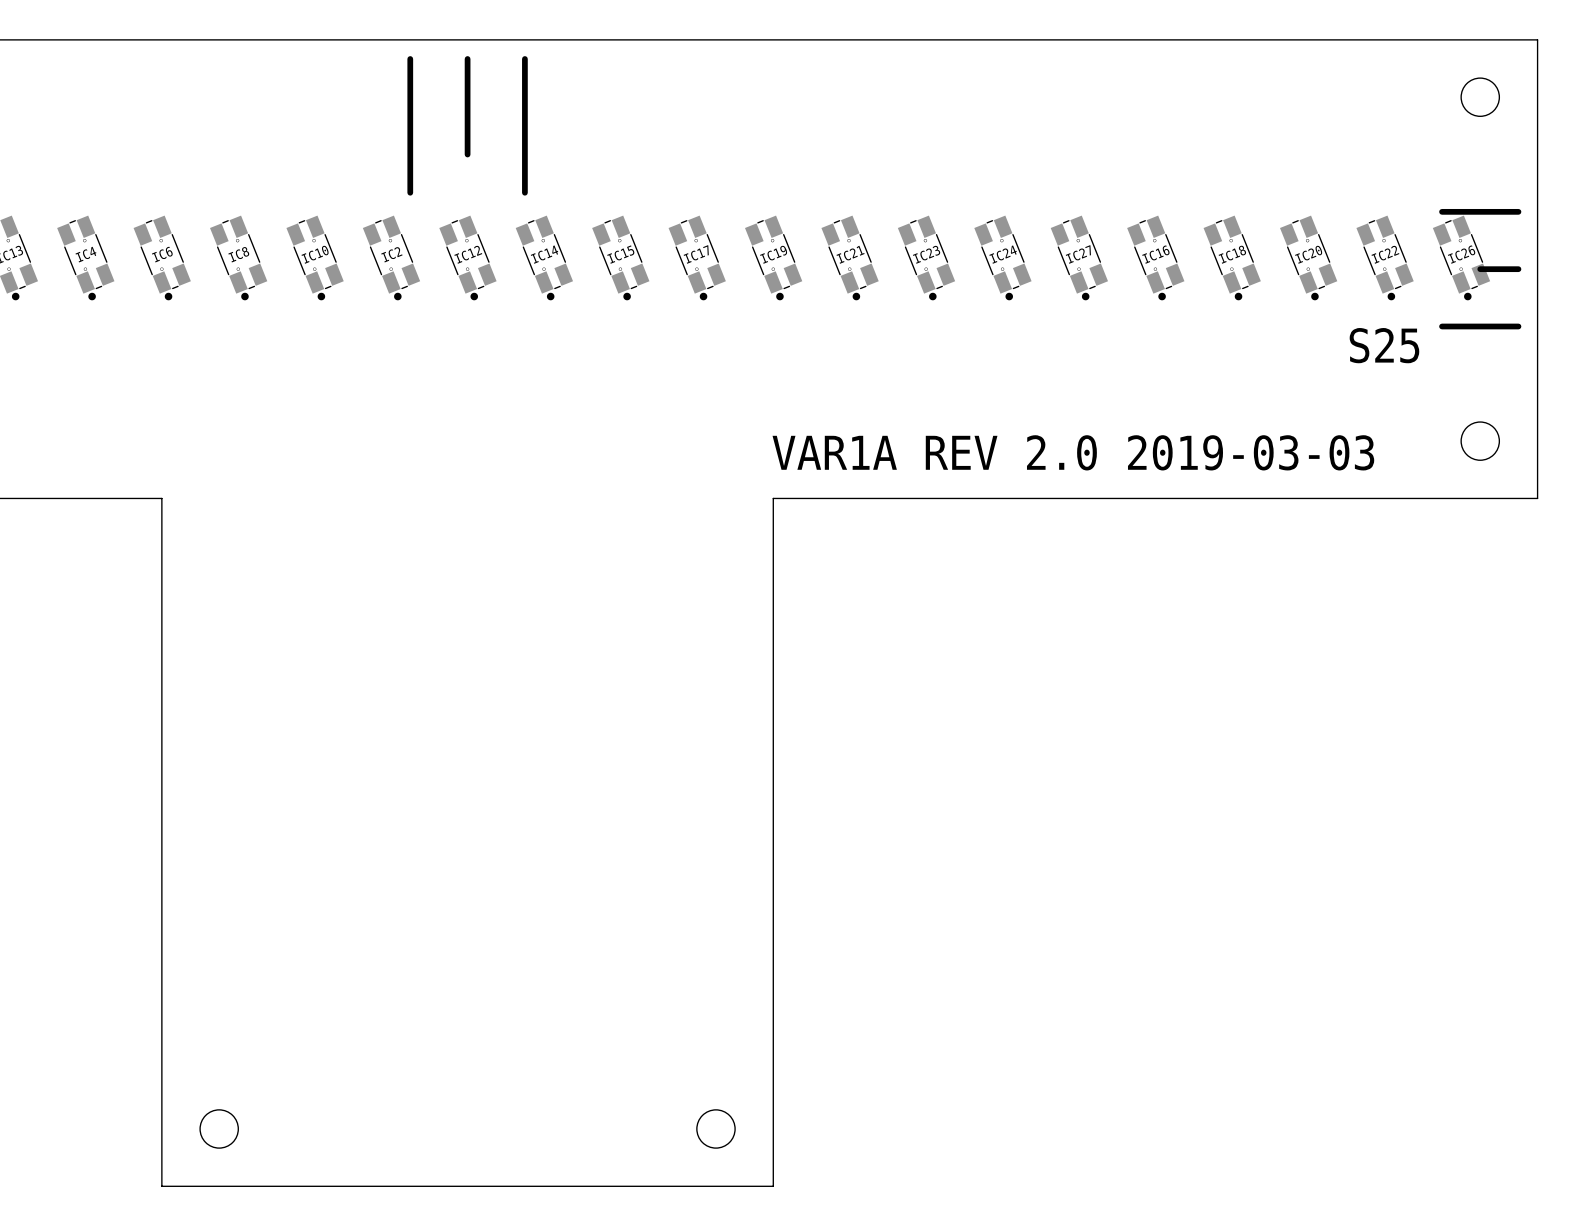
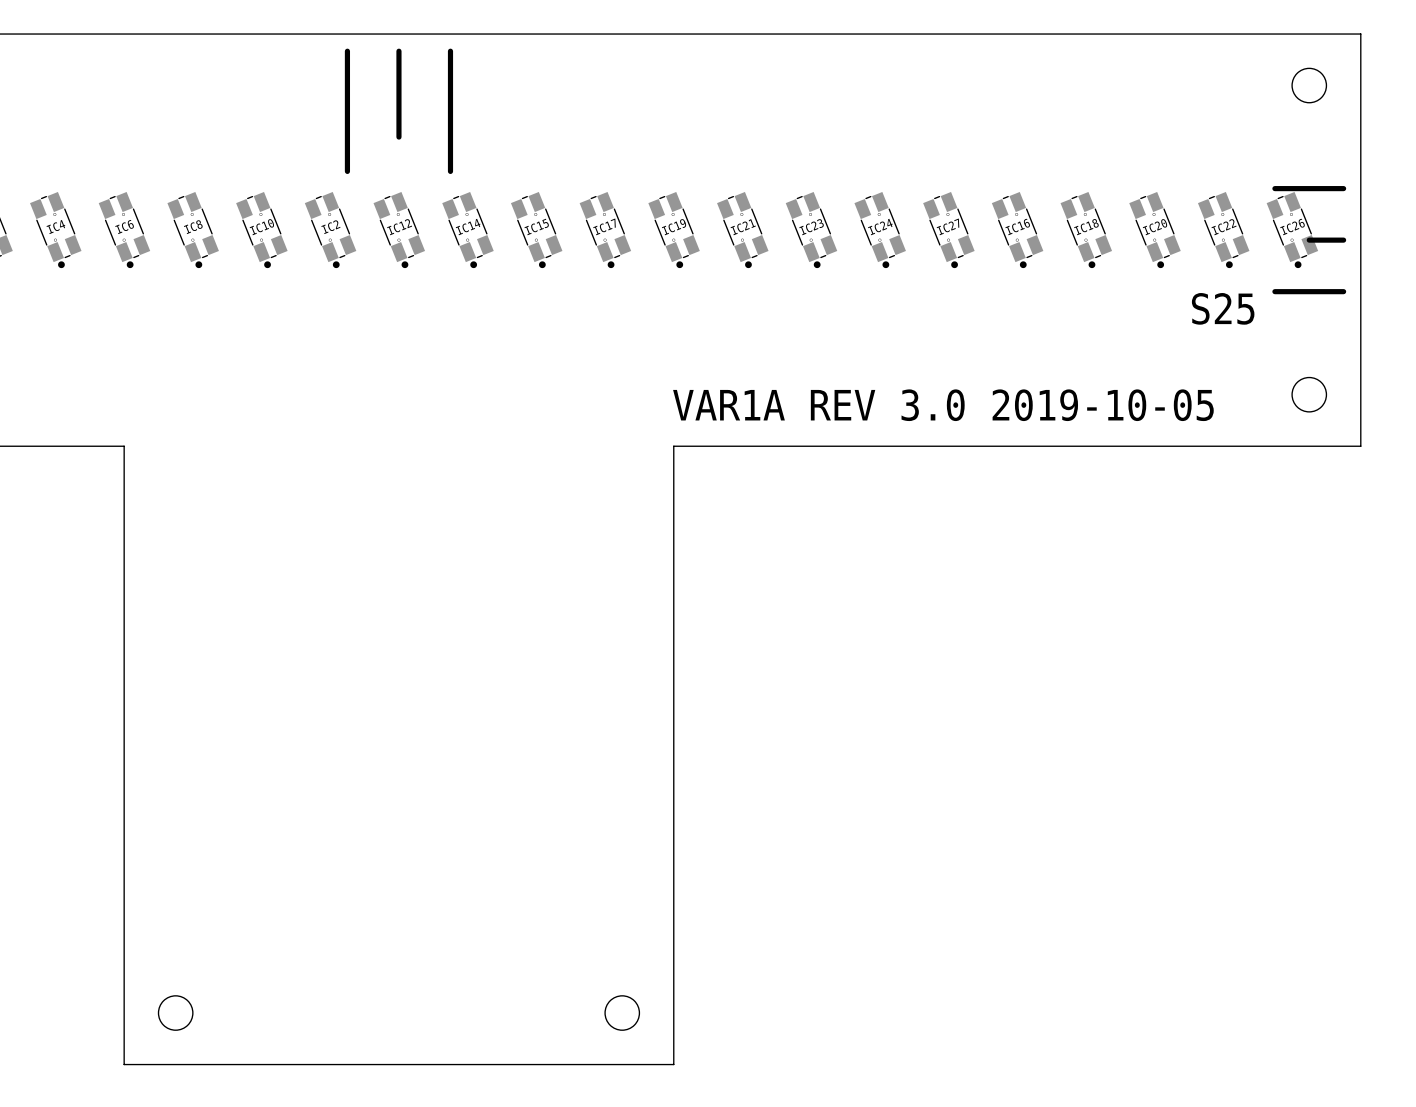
text: VAR1A REV 2.0 2019-03-03 (1073, 452) -> VAR1A REV 3.0 2019-10-05 (943, 405)

